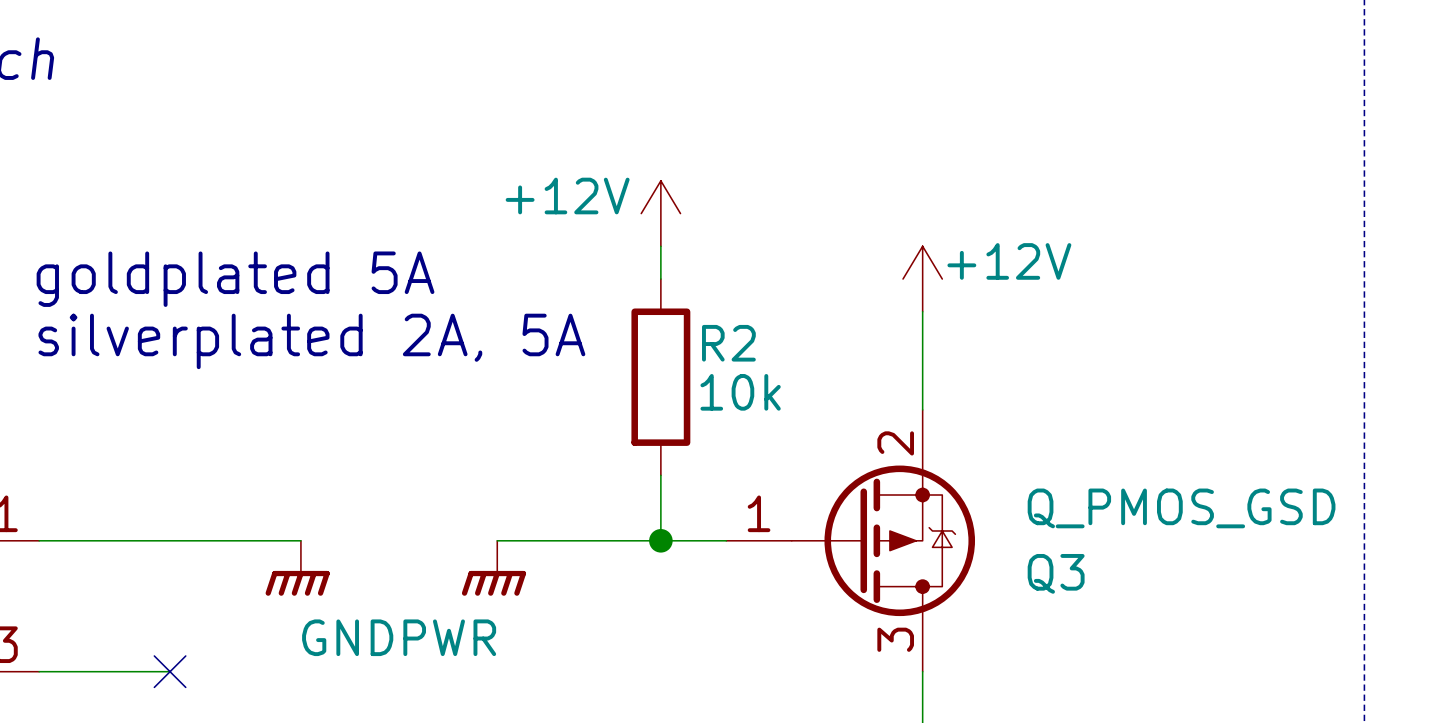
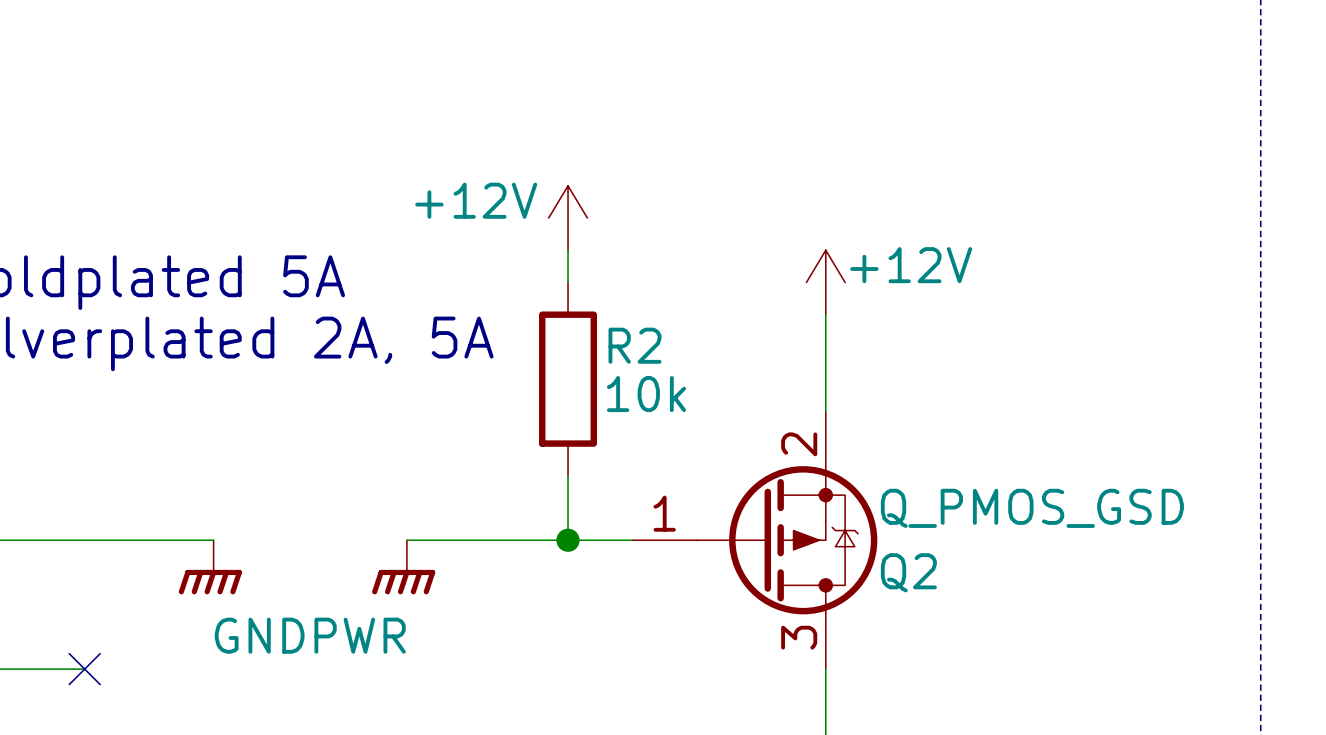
Q3 value position: Q_PMOS_GSD (1181, 508) -> Q_PMOS_GSD (1032, 508)
Q3 name: Q3 (1056, 573) -> Q2 (908, 572)

